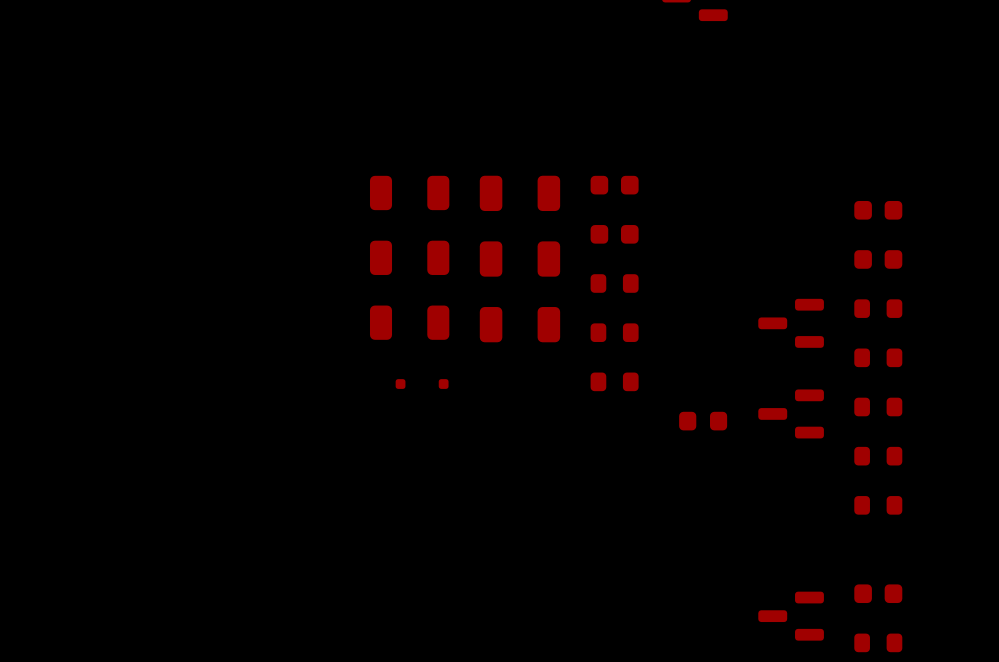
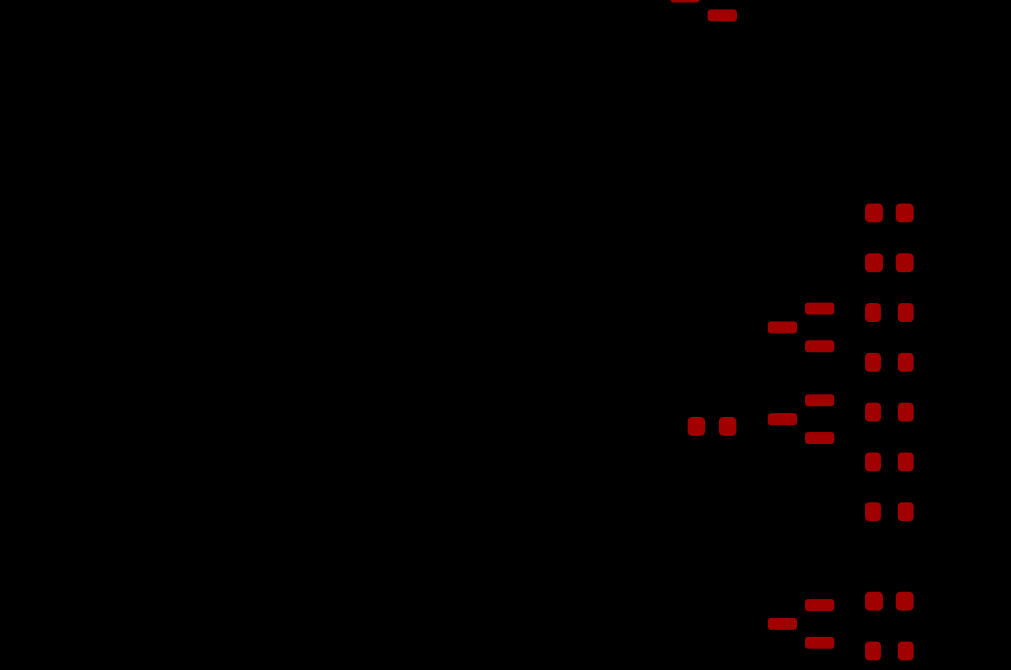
part: (614, 185) -> none
part: (409, 192) -> none
part: (519, 193) -> none
part: (614, 234) -> none
part: (409, 257) -> none
part: (519, 259) -> none
part: (614, 283) -> none
part: (409, 322) -> none
part: (519, 324) -> none
part: (614, 332) -> none
part: (614, 381) -> none
part: (422, 384) -> none

